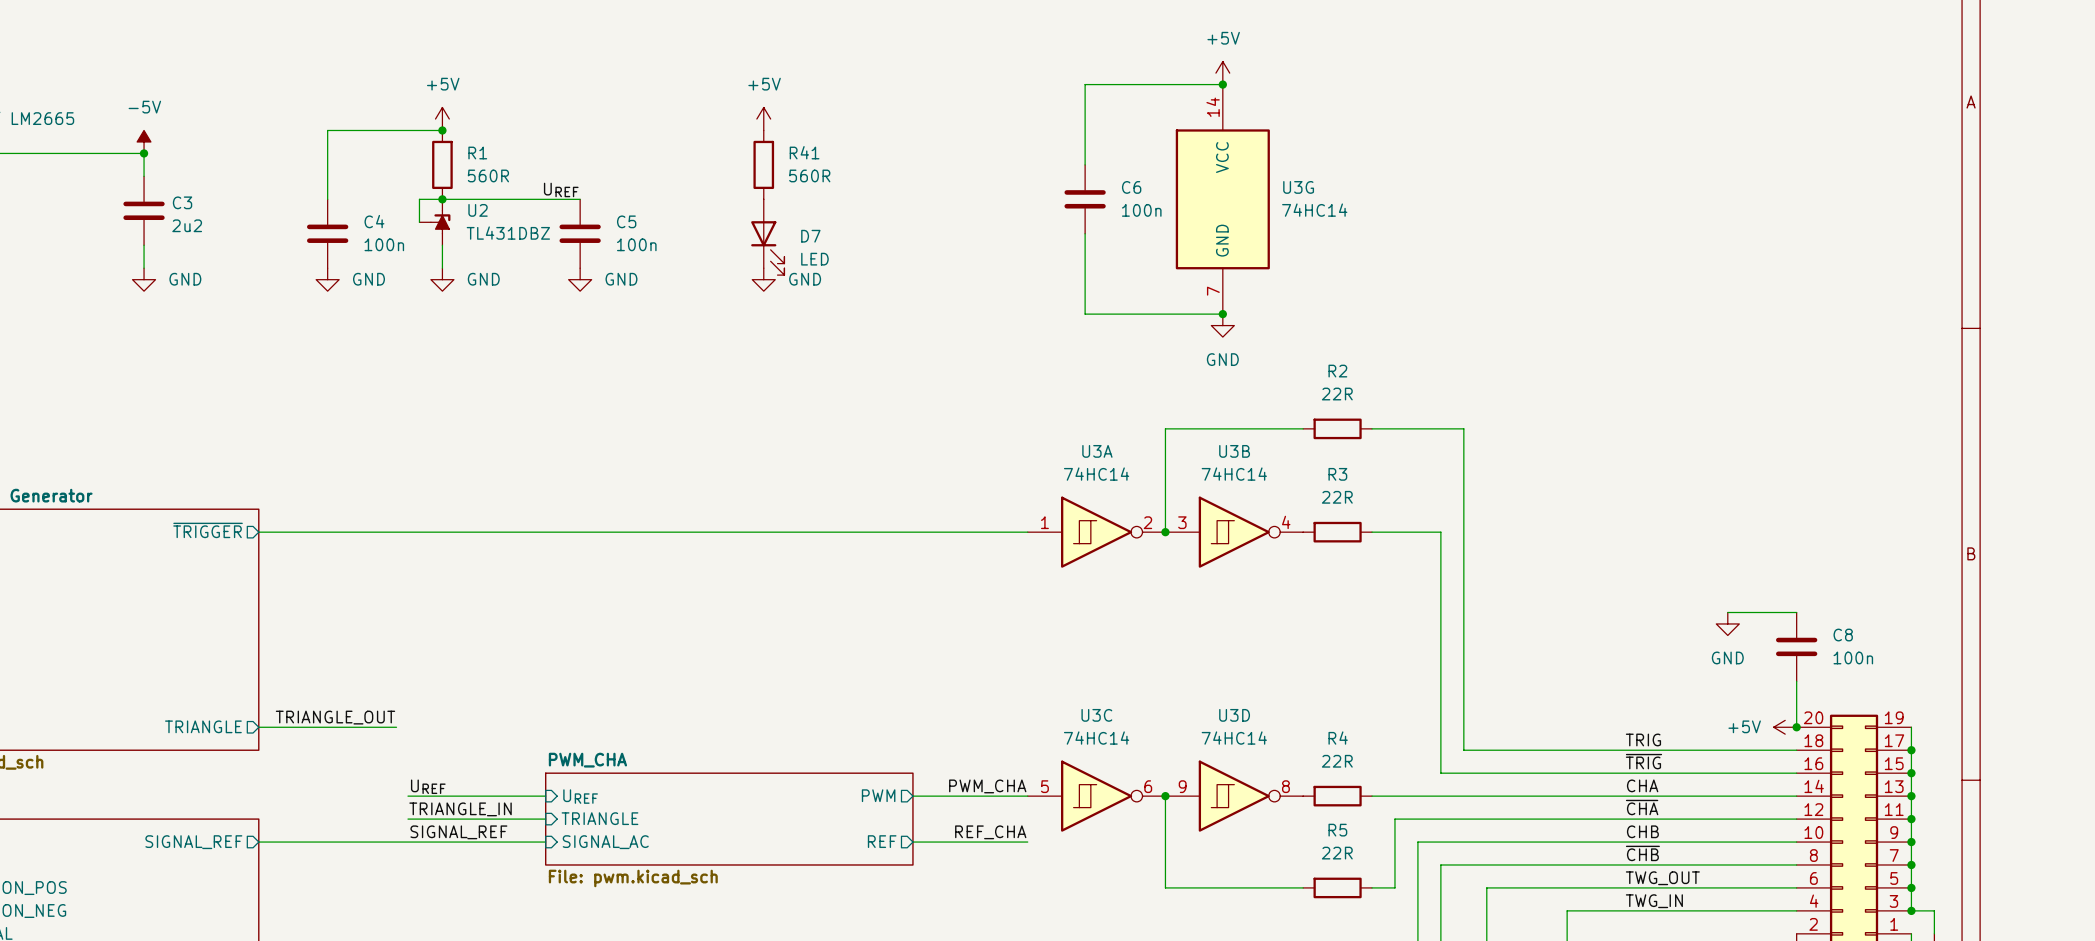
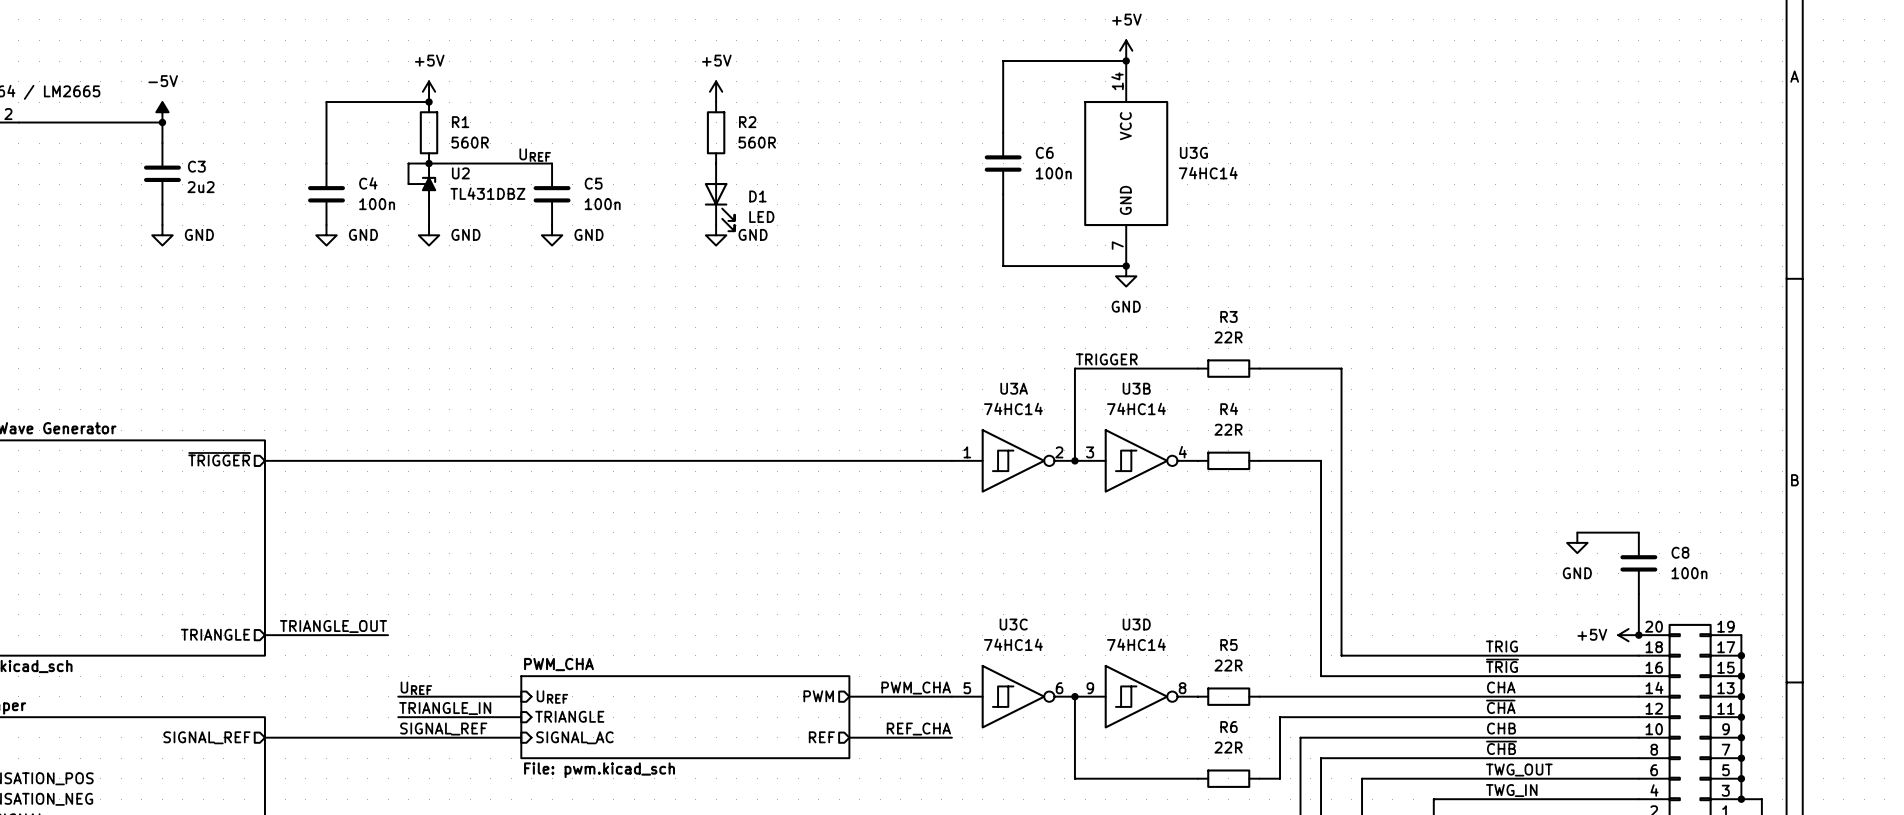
R41 name: R41 (804, 152) -> R2 (747, 122)
D7 name: D7 (810, 236) -> D1 (757, 196)
R2 name: R2 (1337, 371) -> R3 (1228, 316)
label: none -> TRIGGER (1106, 359)
R3 name: R3 (1337, 474) -> R4 (1229, 408)
R4 name: R4 (1338, 738) -> R5 (1228, 645)
R5 name: R5 (1337, 830) -> R6 (1228, 727)

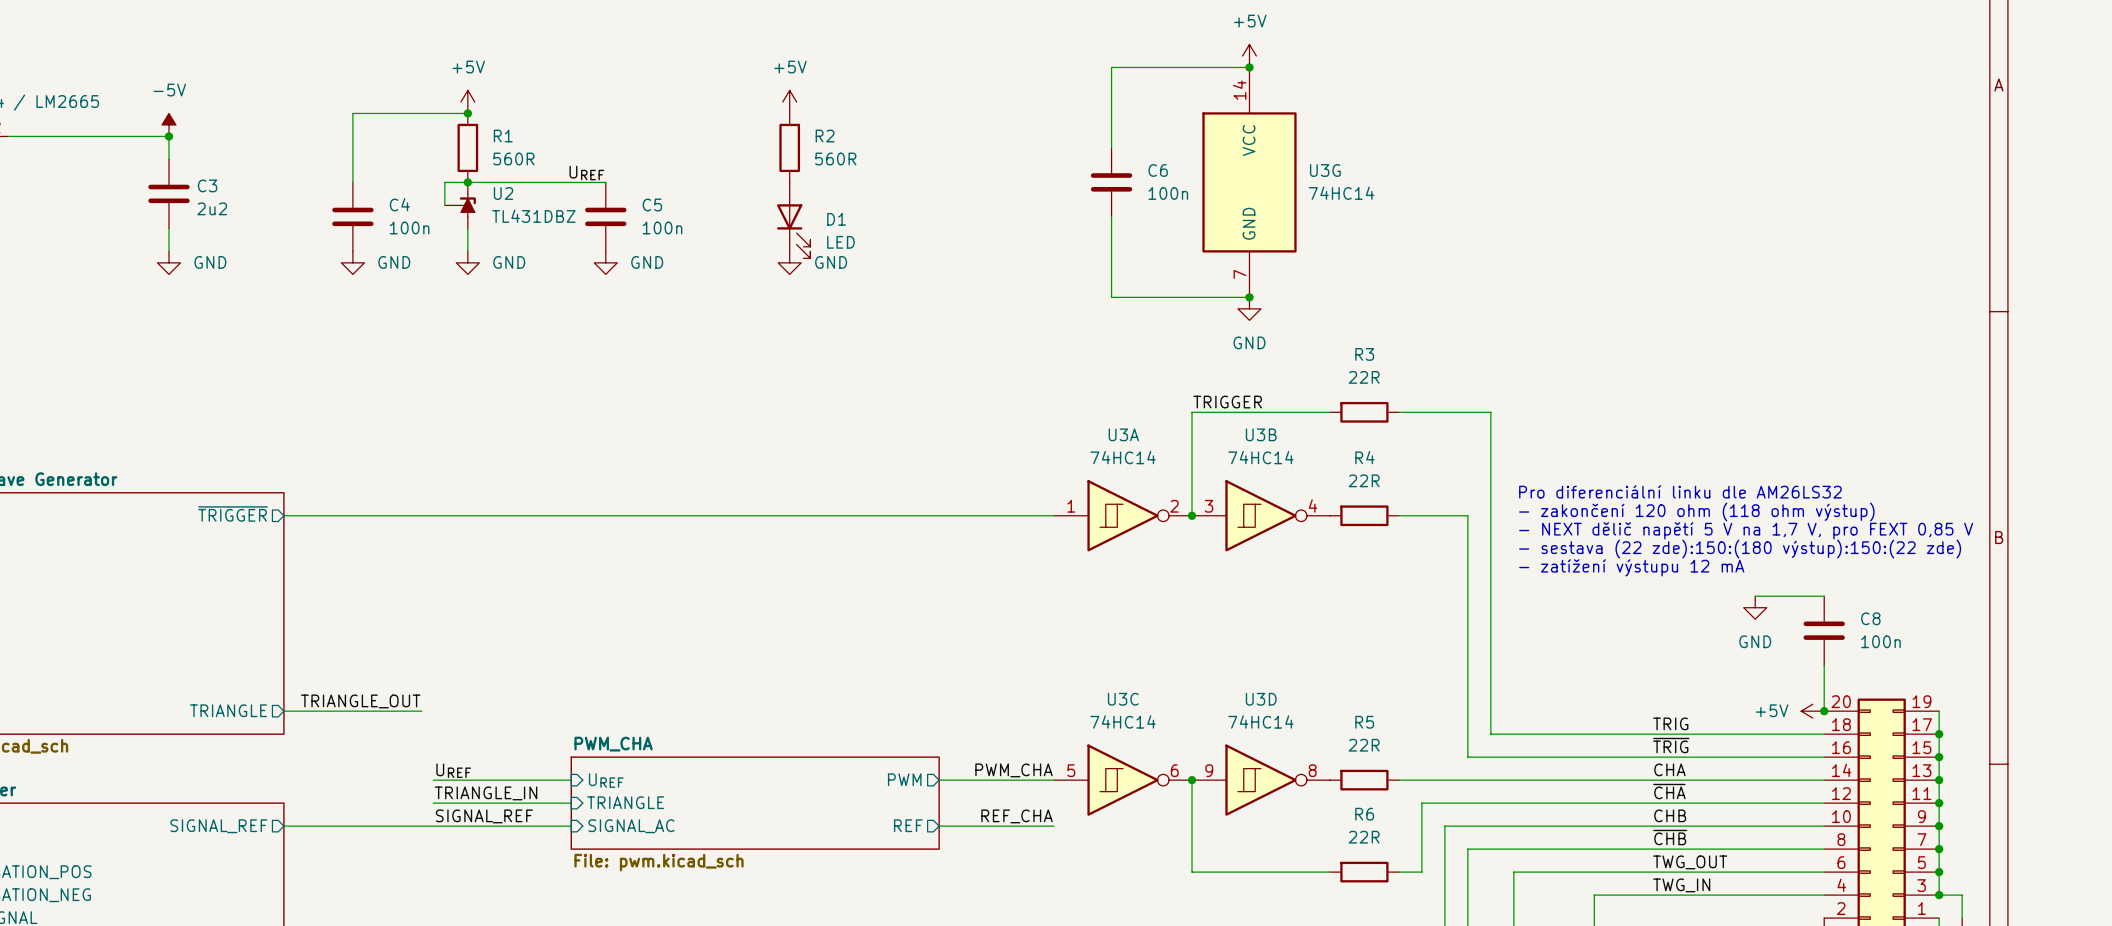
text: none -> Pro diferenciální linku dle AM26LS32 (1680, 491)
text: none -> - zakončení 120 ohm (118 ohm výstup) (1696, 512)
text: none -> - NEXT dělič napětí 5 V na 1,7 V, pro FEXT 0,85 V (1746, 530)
text: none -> - sestava (22 zde):150:(180 výstup):150:(22 zde) (1740, 549)
text: none -> - zatížení výstupu 12 mA (1631, 567)

